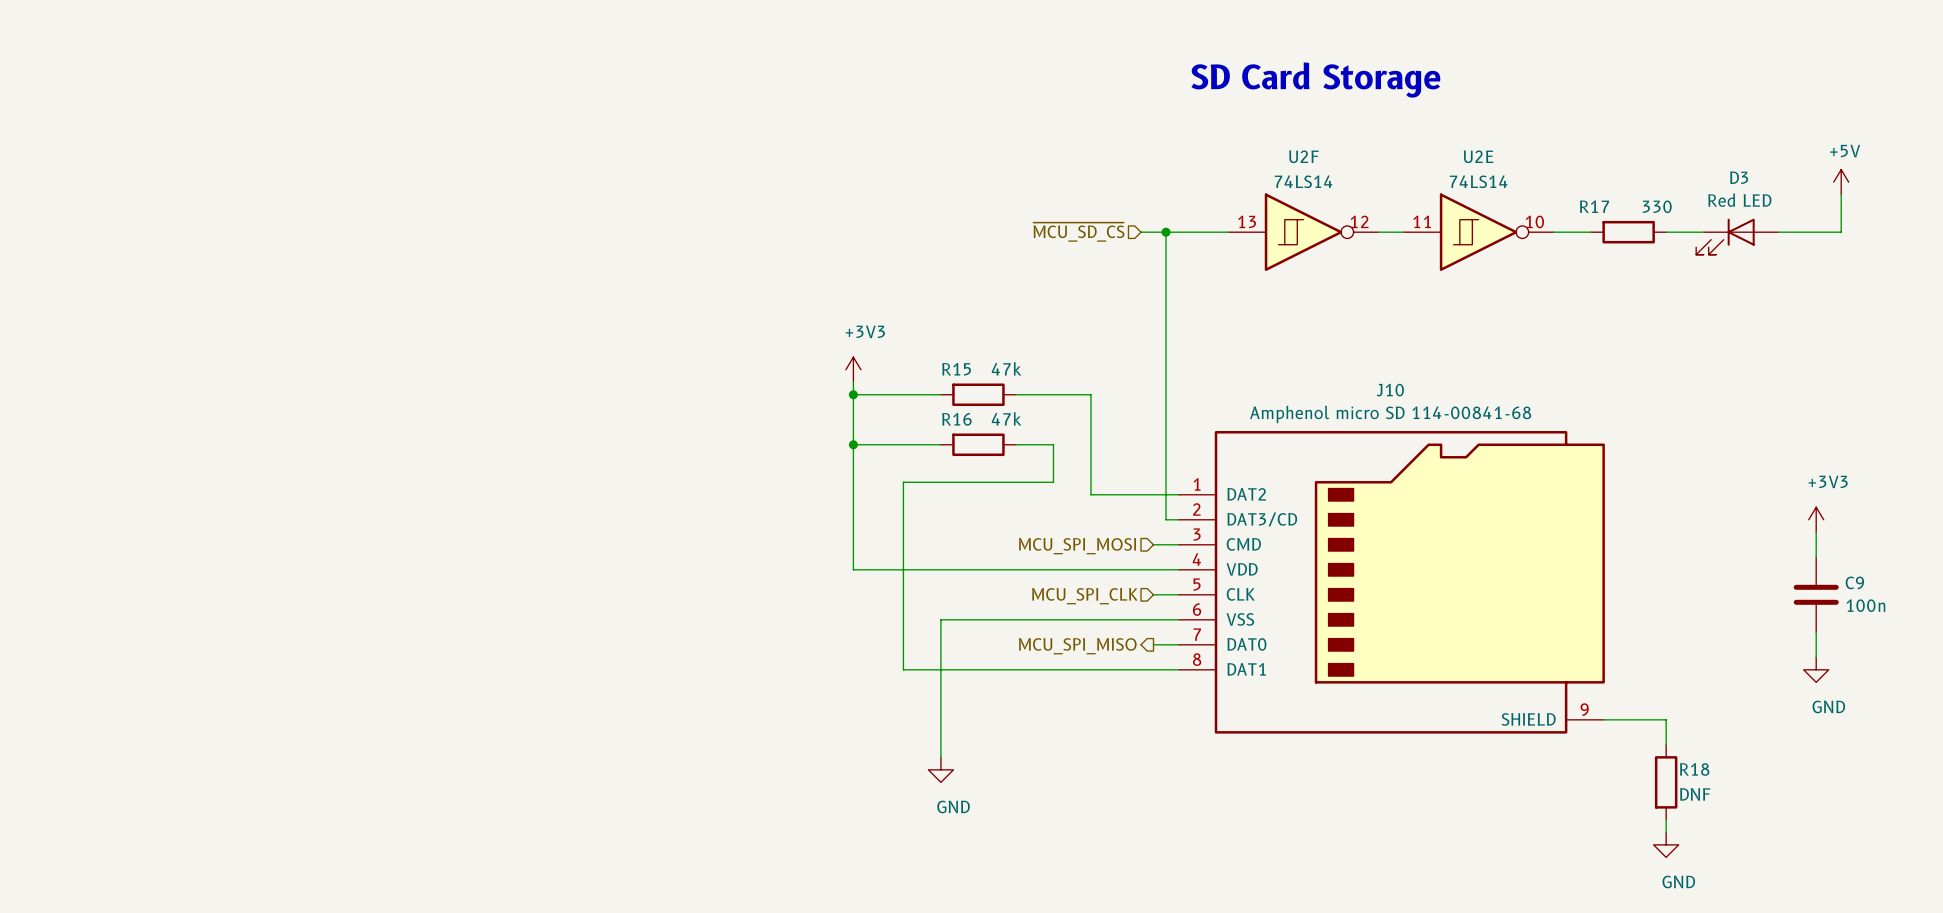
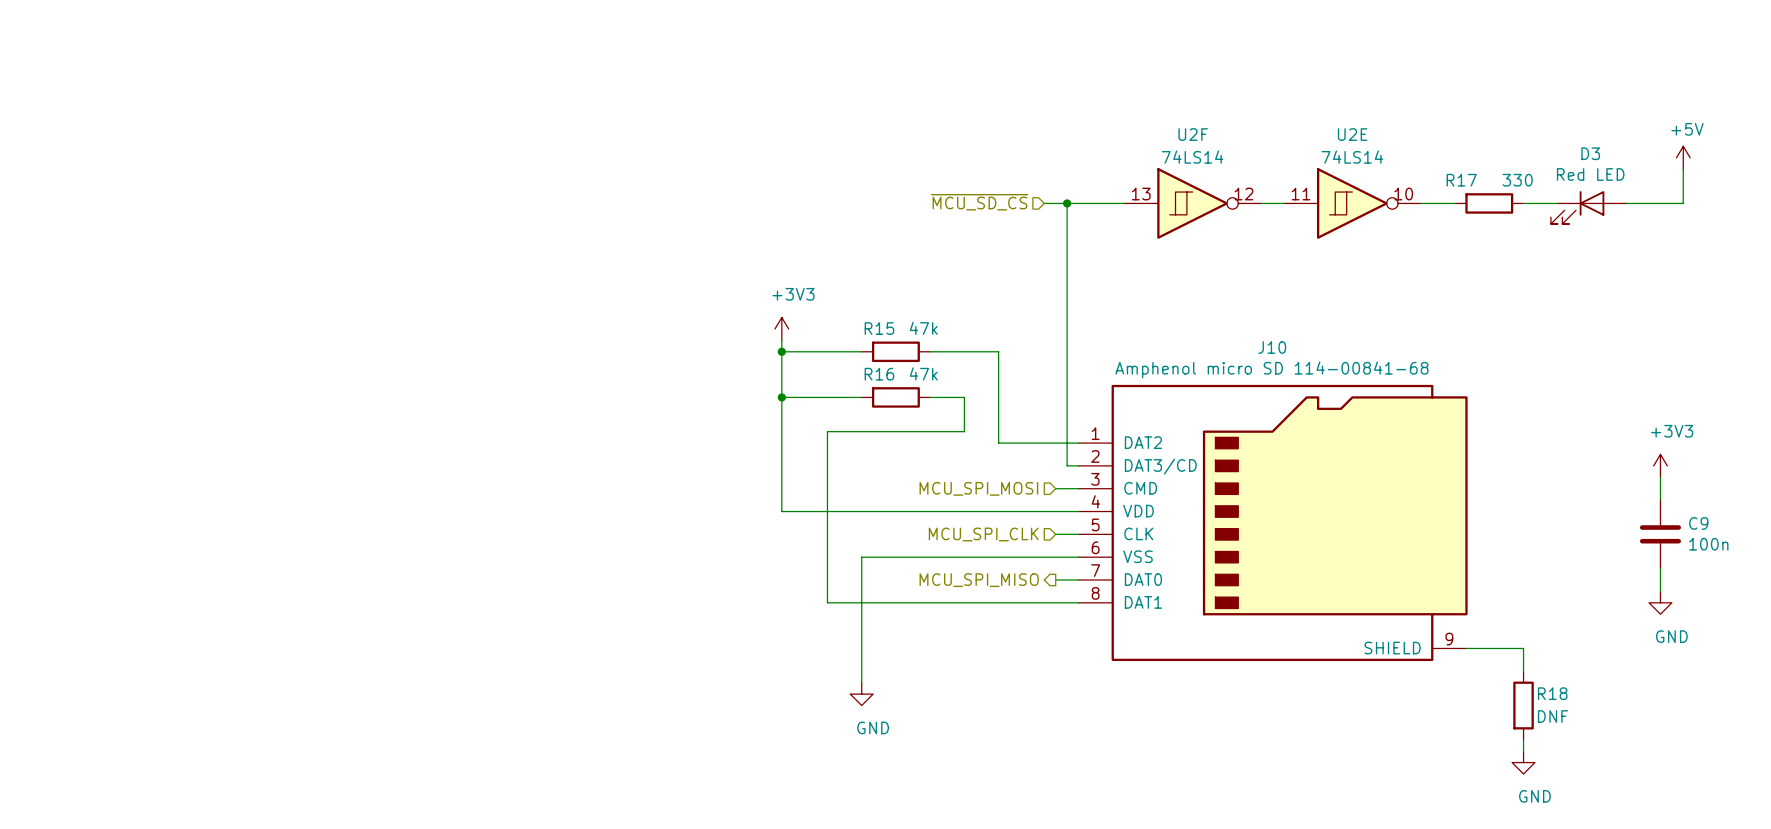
text: SD Card Storage (1315, 80) -> none

